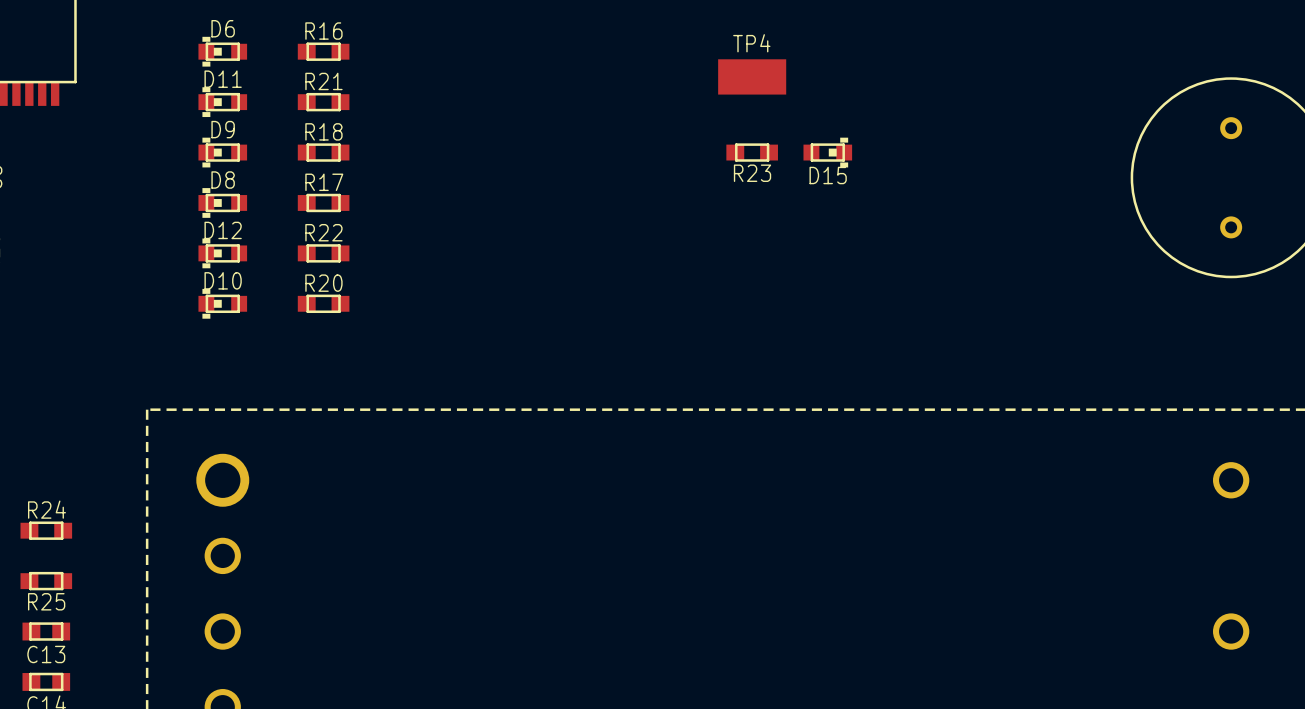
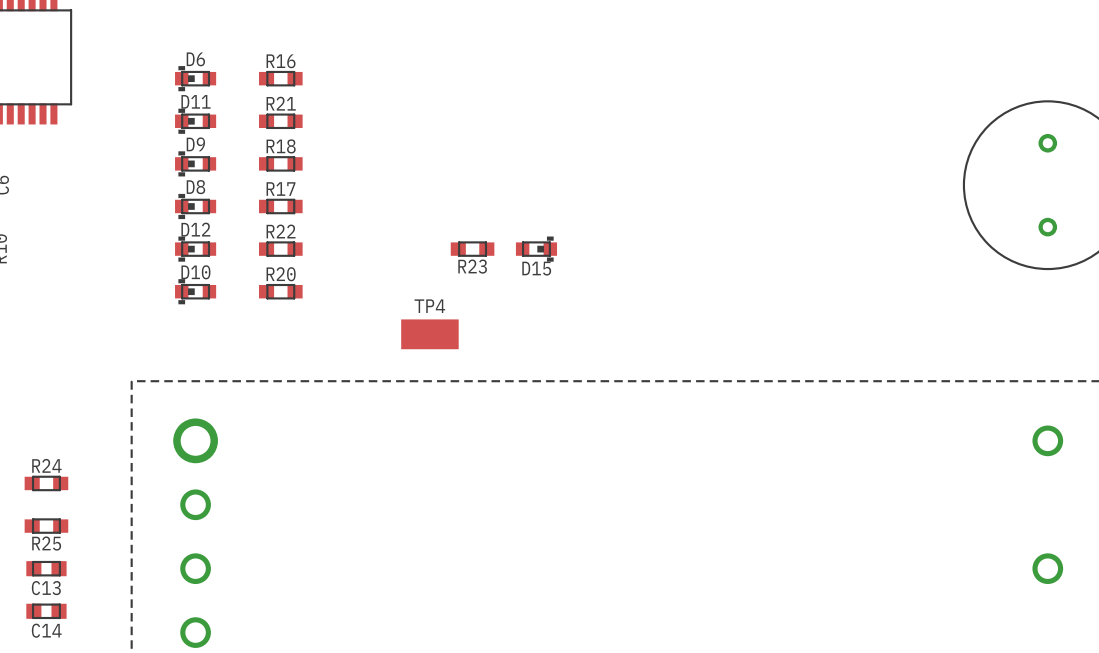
TP4 position: (752, 76) -> (429, 334)
R23 position: (752, 152) -> (472, 249)
D15 position: (827, 152) -> (536, 249)

